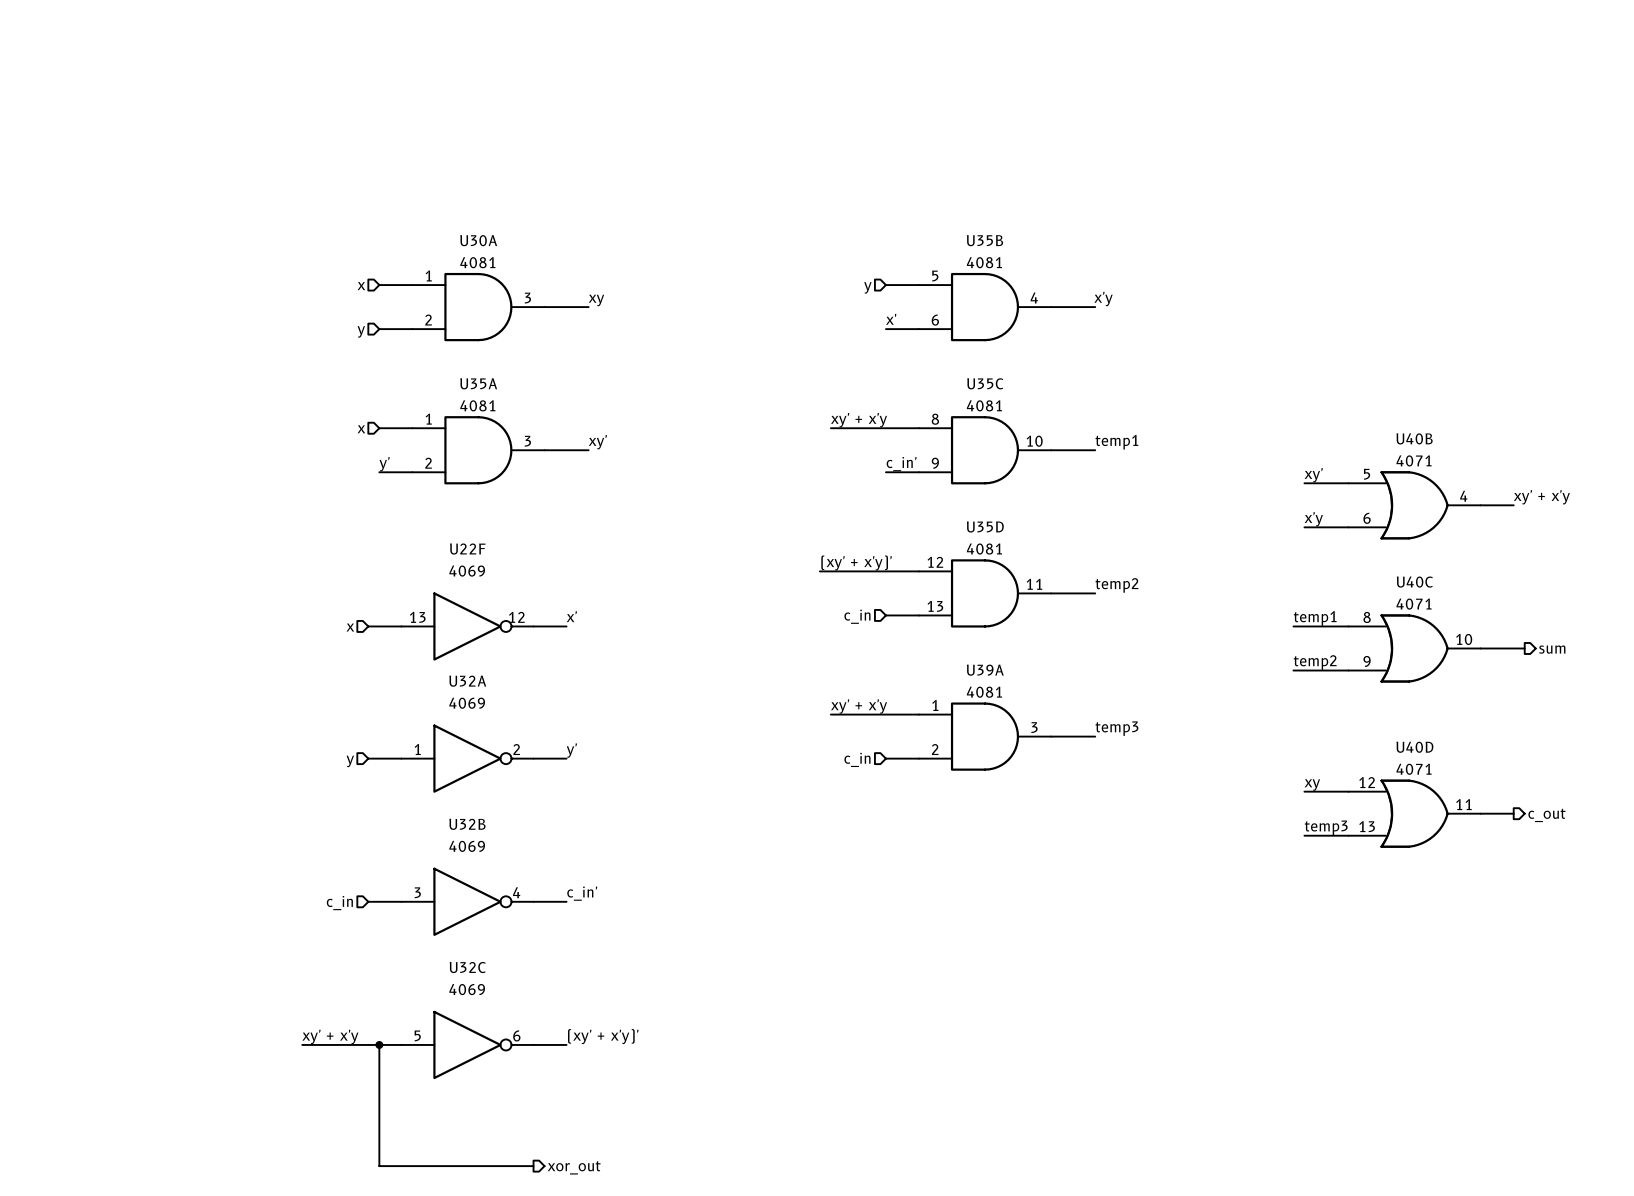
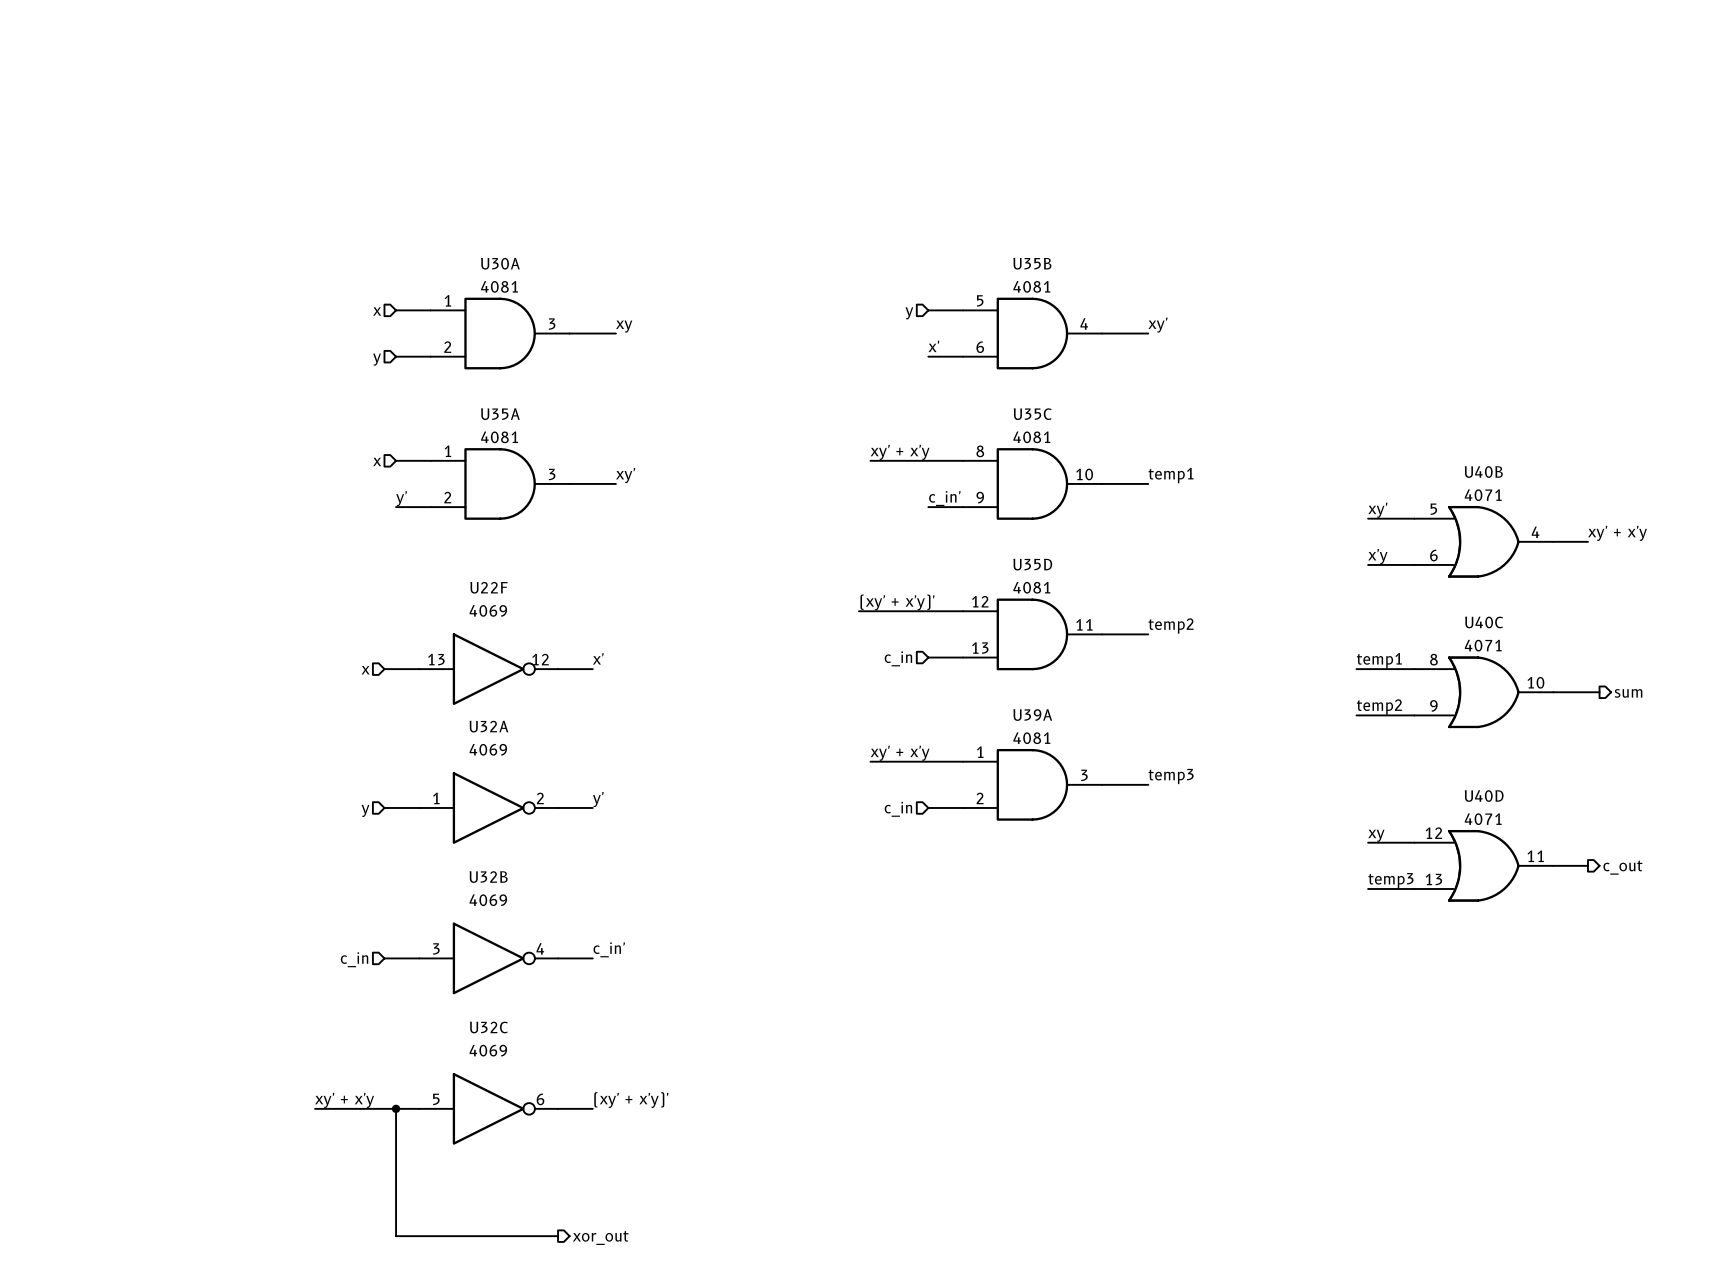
label: x'y (1103, 299) -> xy' (1157, 325)

